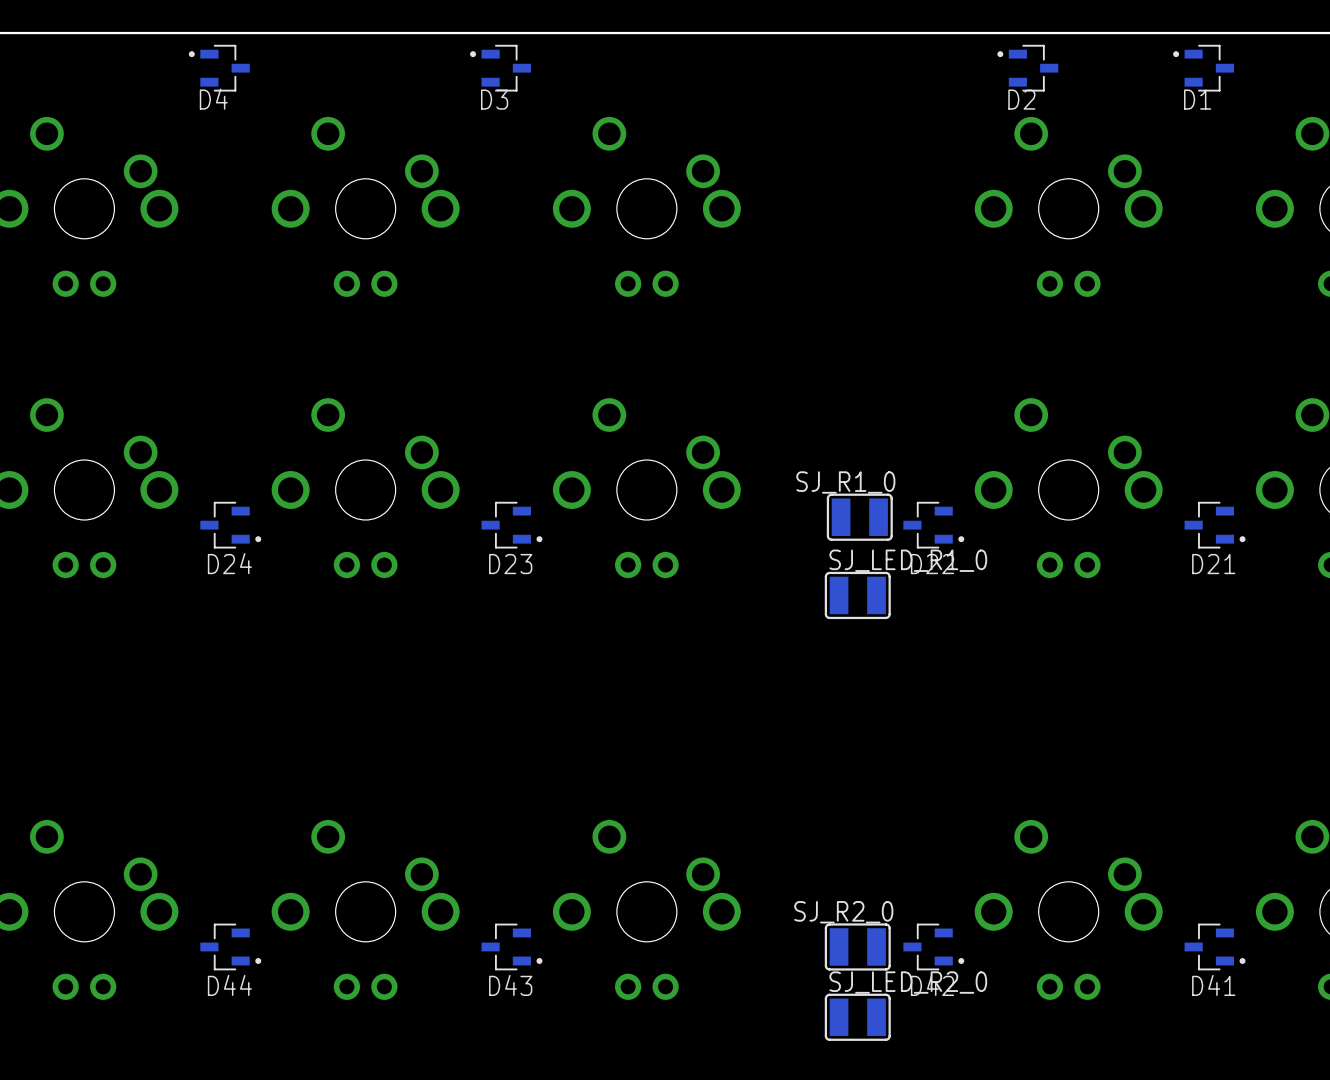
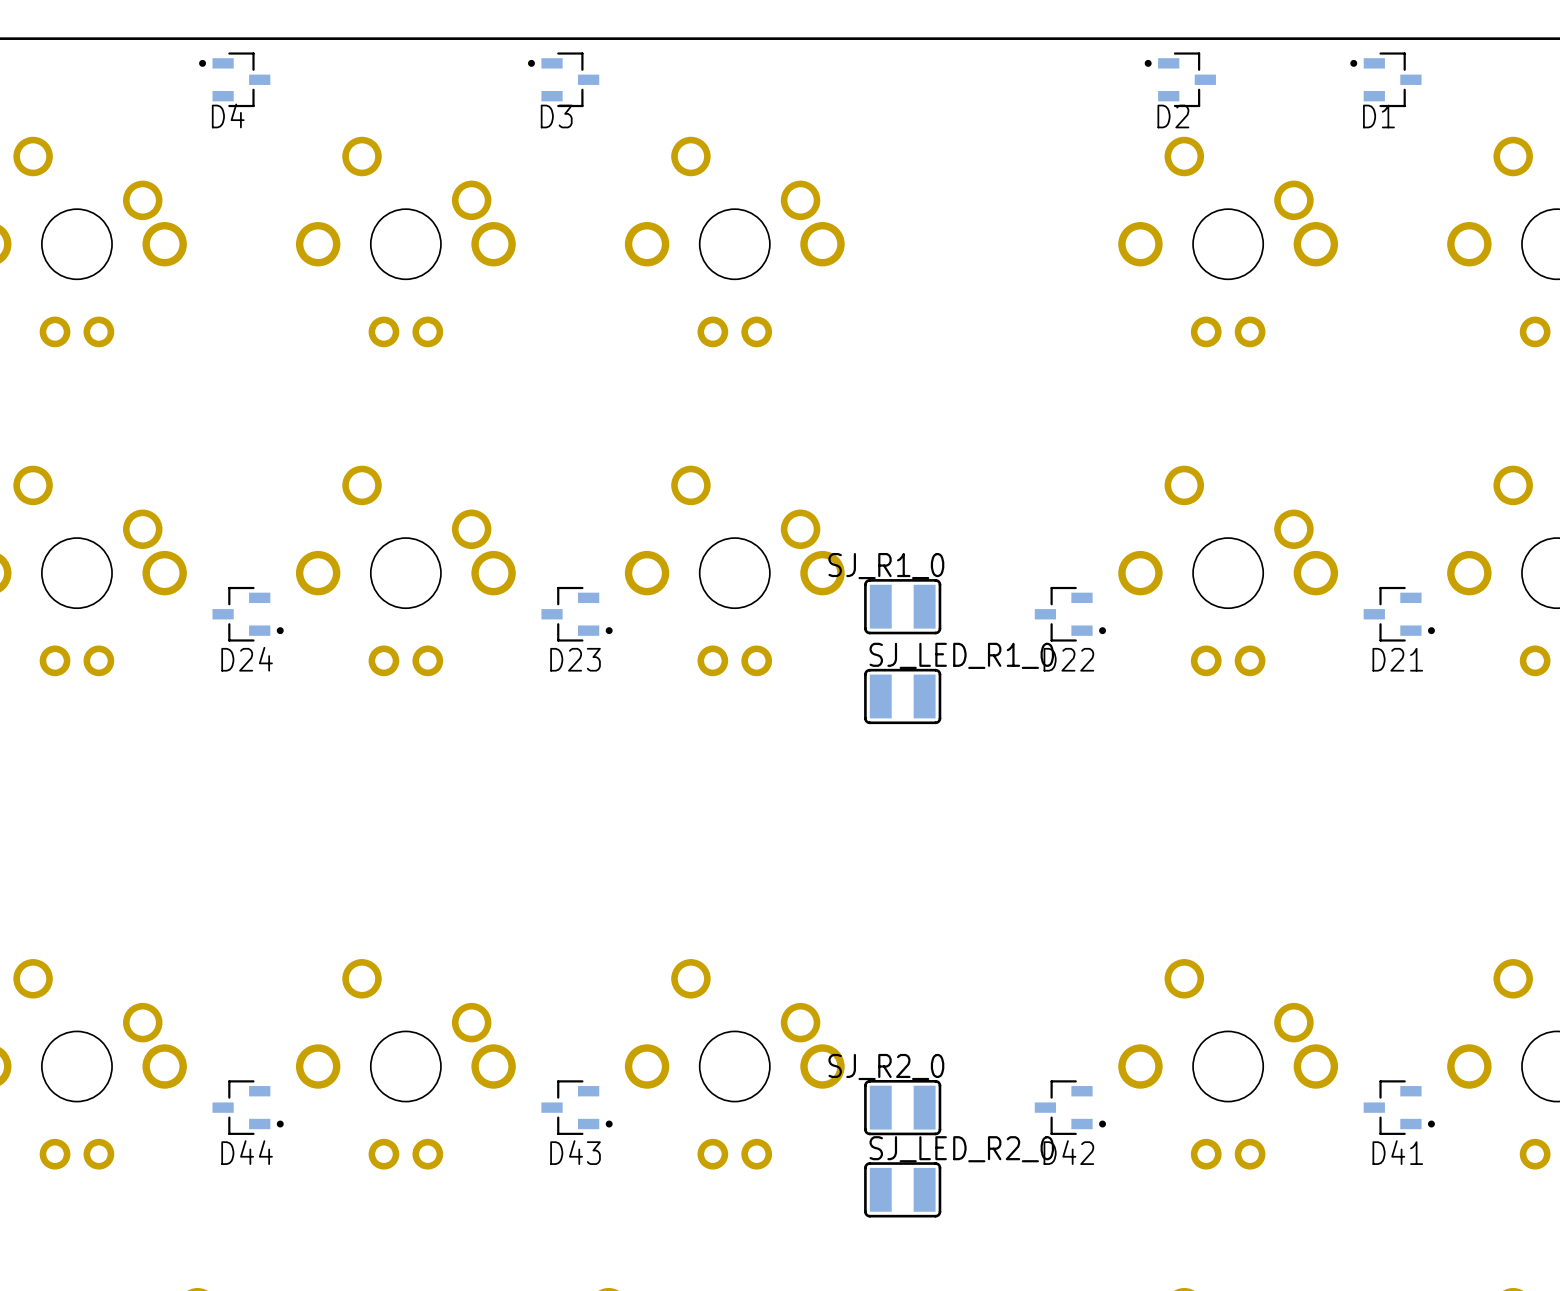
SJ_R1_0 position: (859, 517) -> (902, 606)
SJ_LED_R1_0 position: (857, 595) -> (902, 696)
SJ_R2_0 position: (857, 946) -> (902, 1107)
SJ_LED_R2_0 position: (857, 1017) -> (902, 1189)

